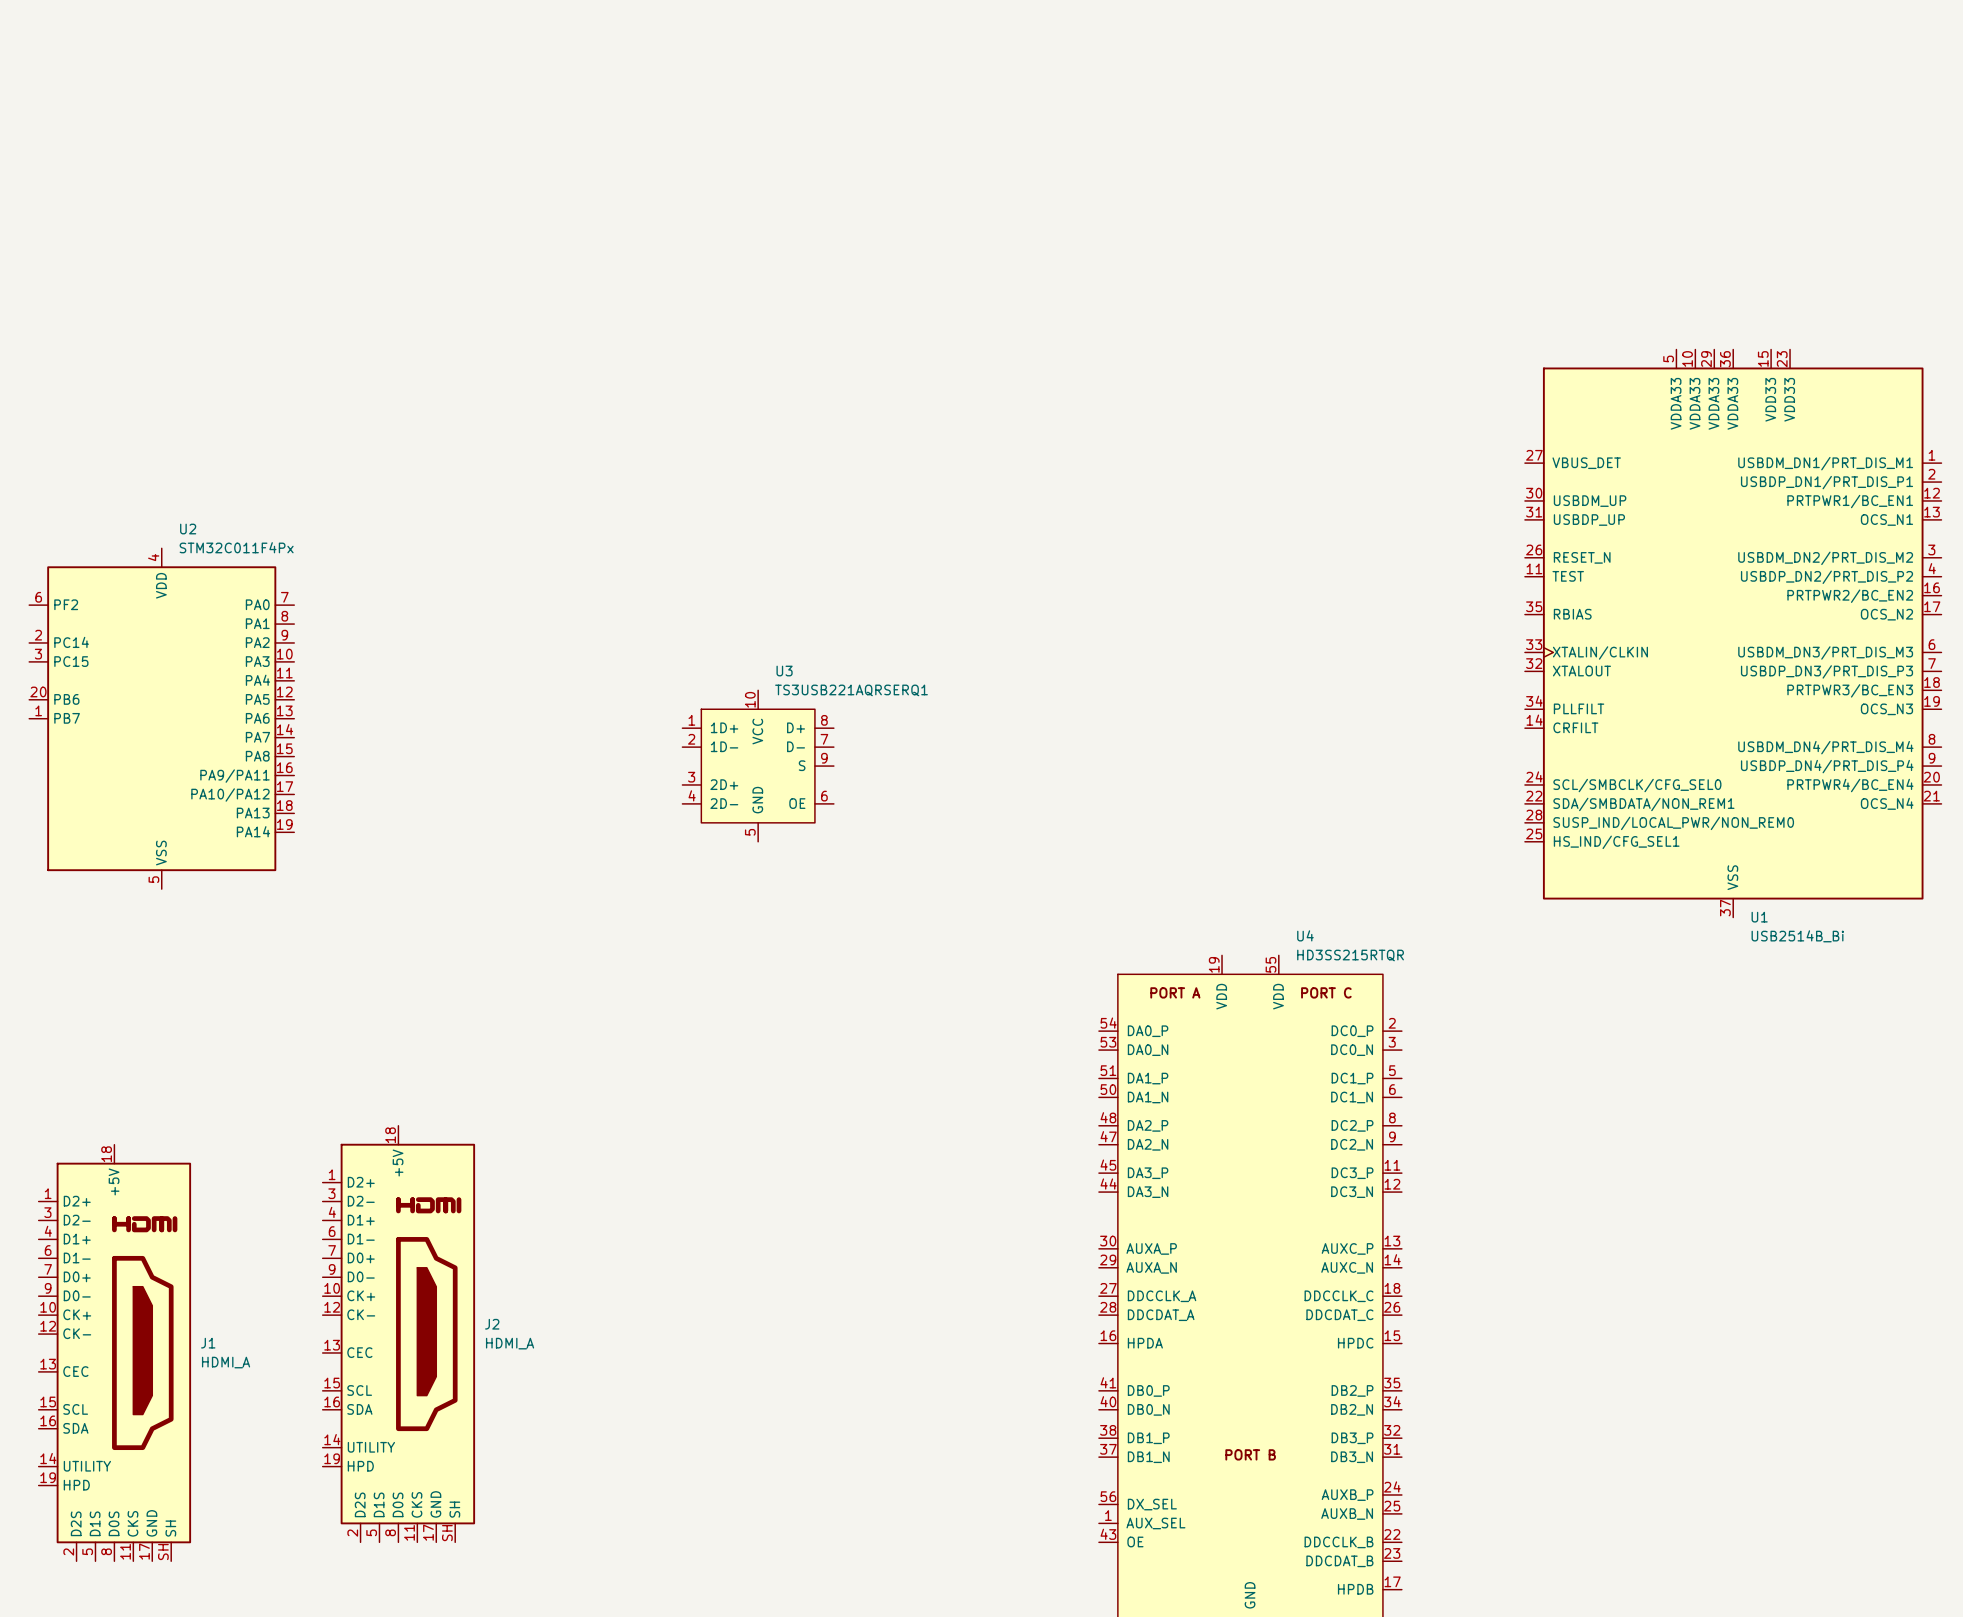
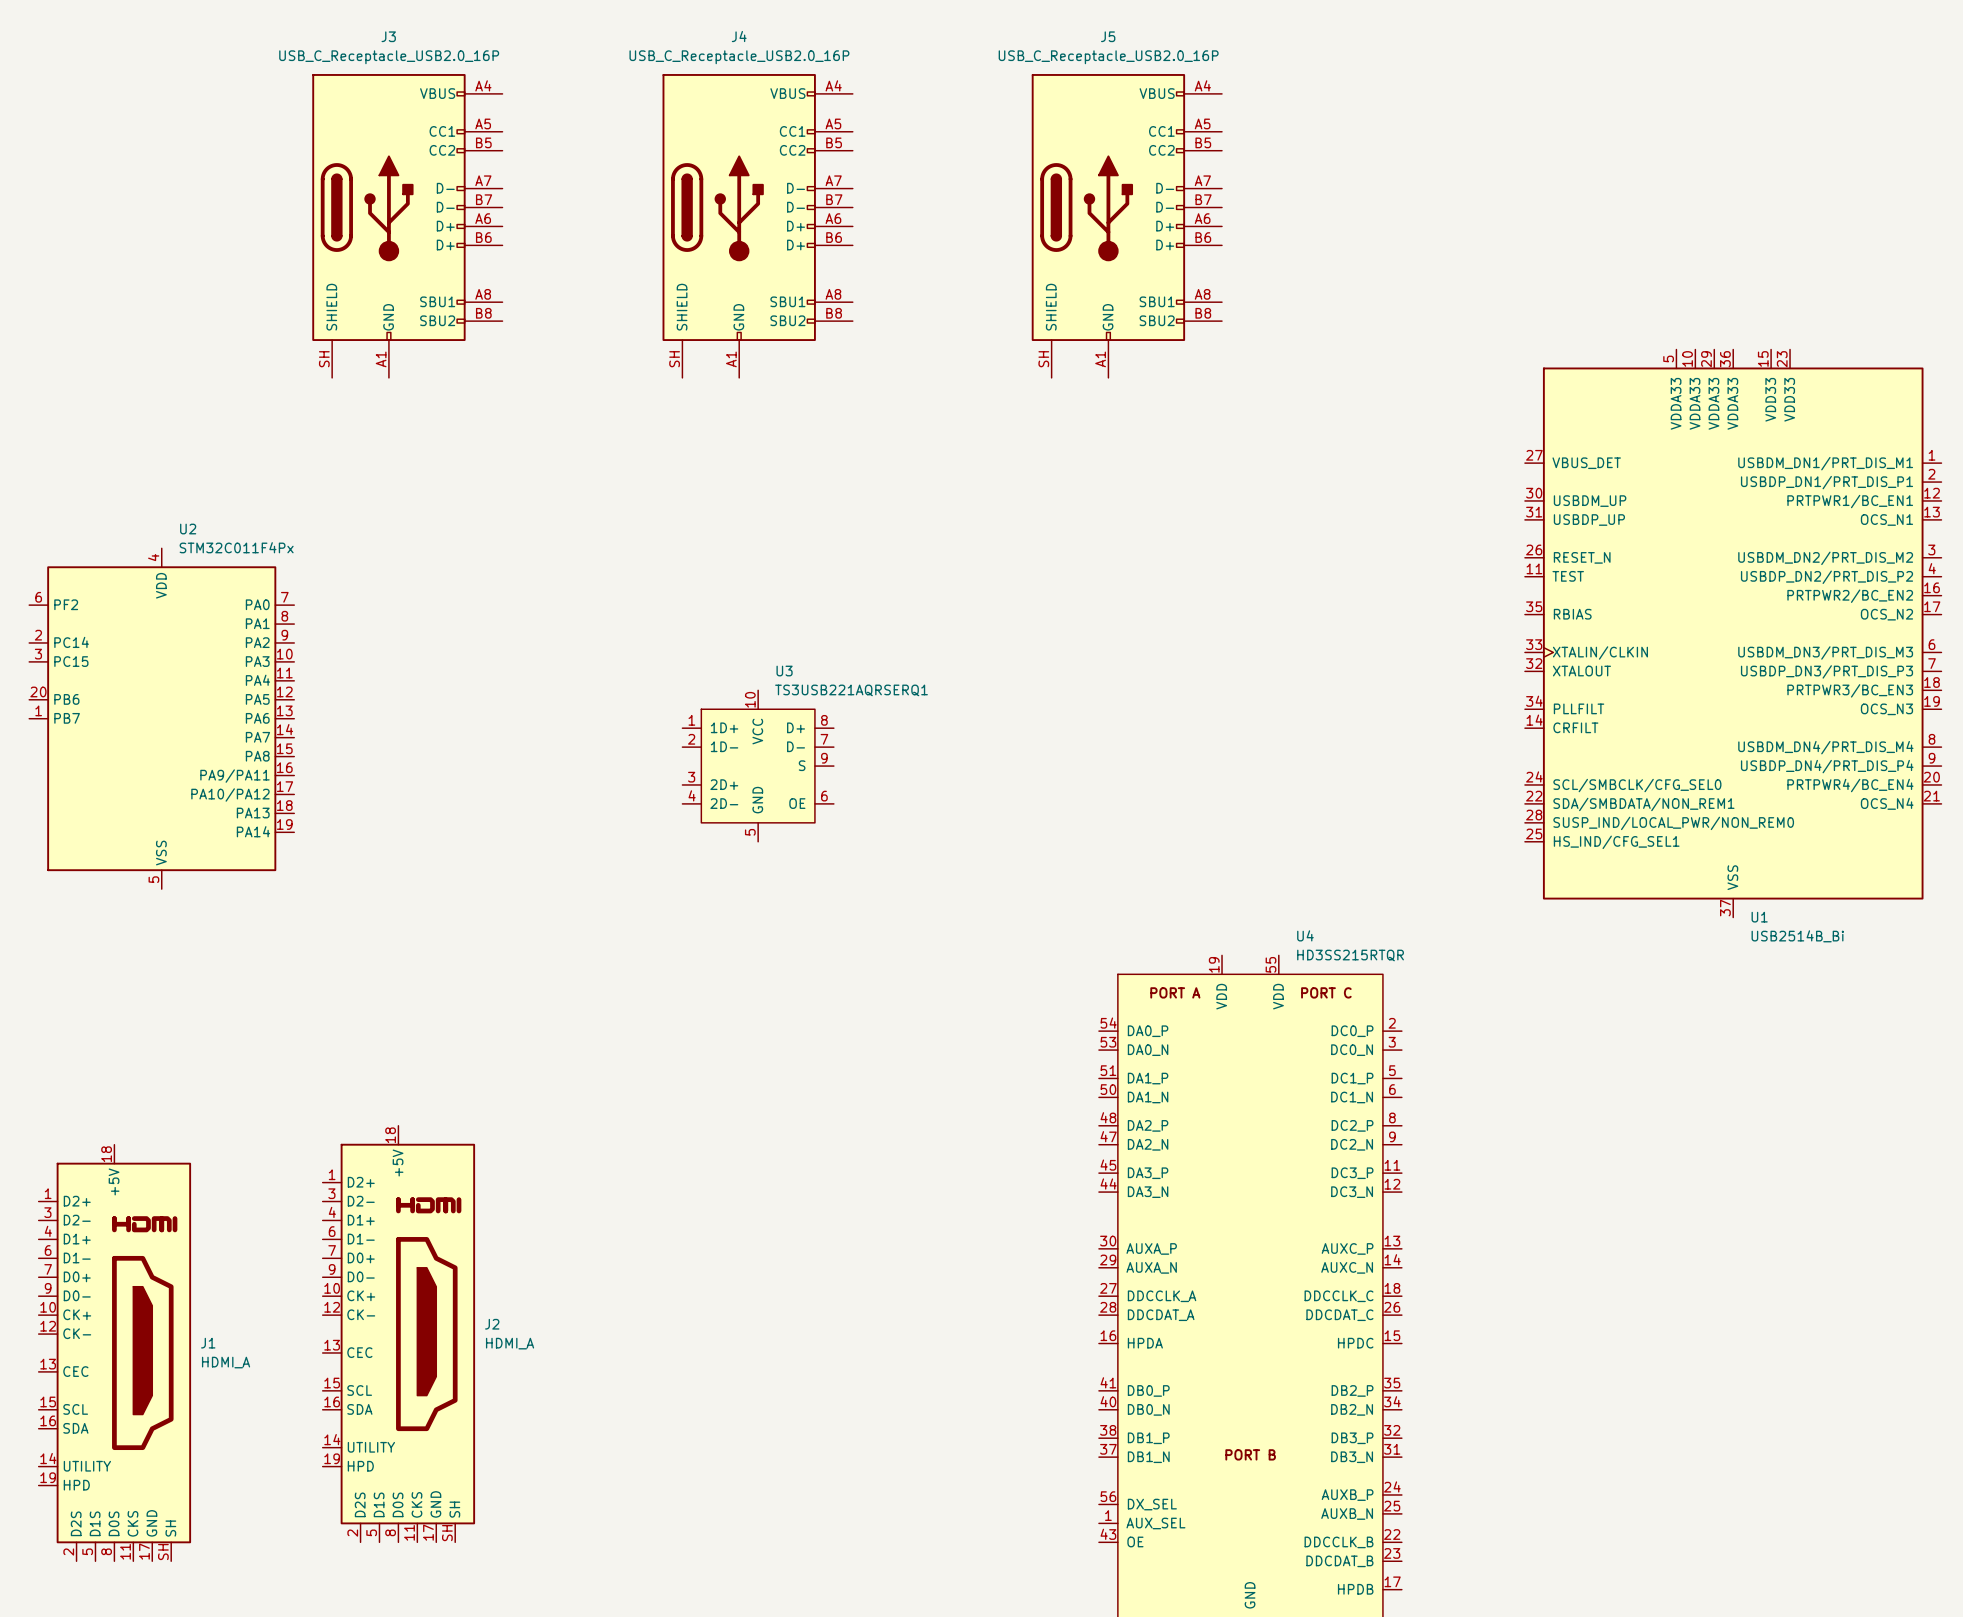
J3: none -> USB_C_Receptacle_USB2.0_16P (407, 225)
J4: none -> USB_C_Receptacle_USB2.0_16P (757, 225)
J5: none -> USB_C_Receptacle_USB2.0_16P (1126, 225)

